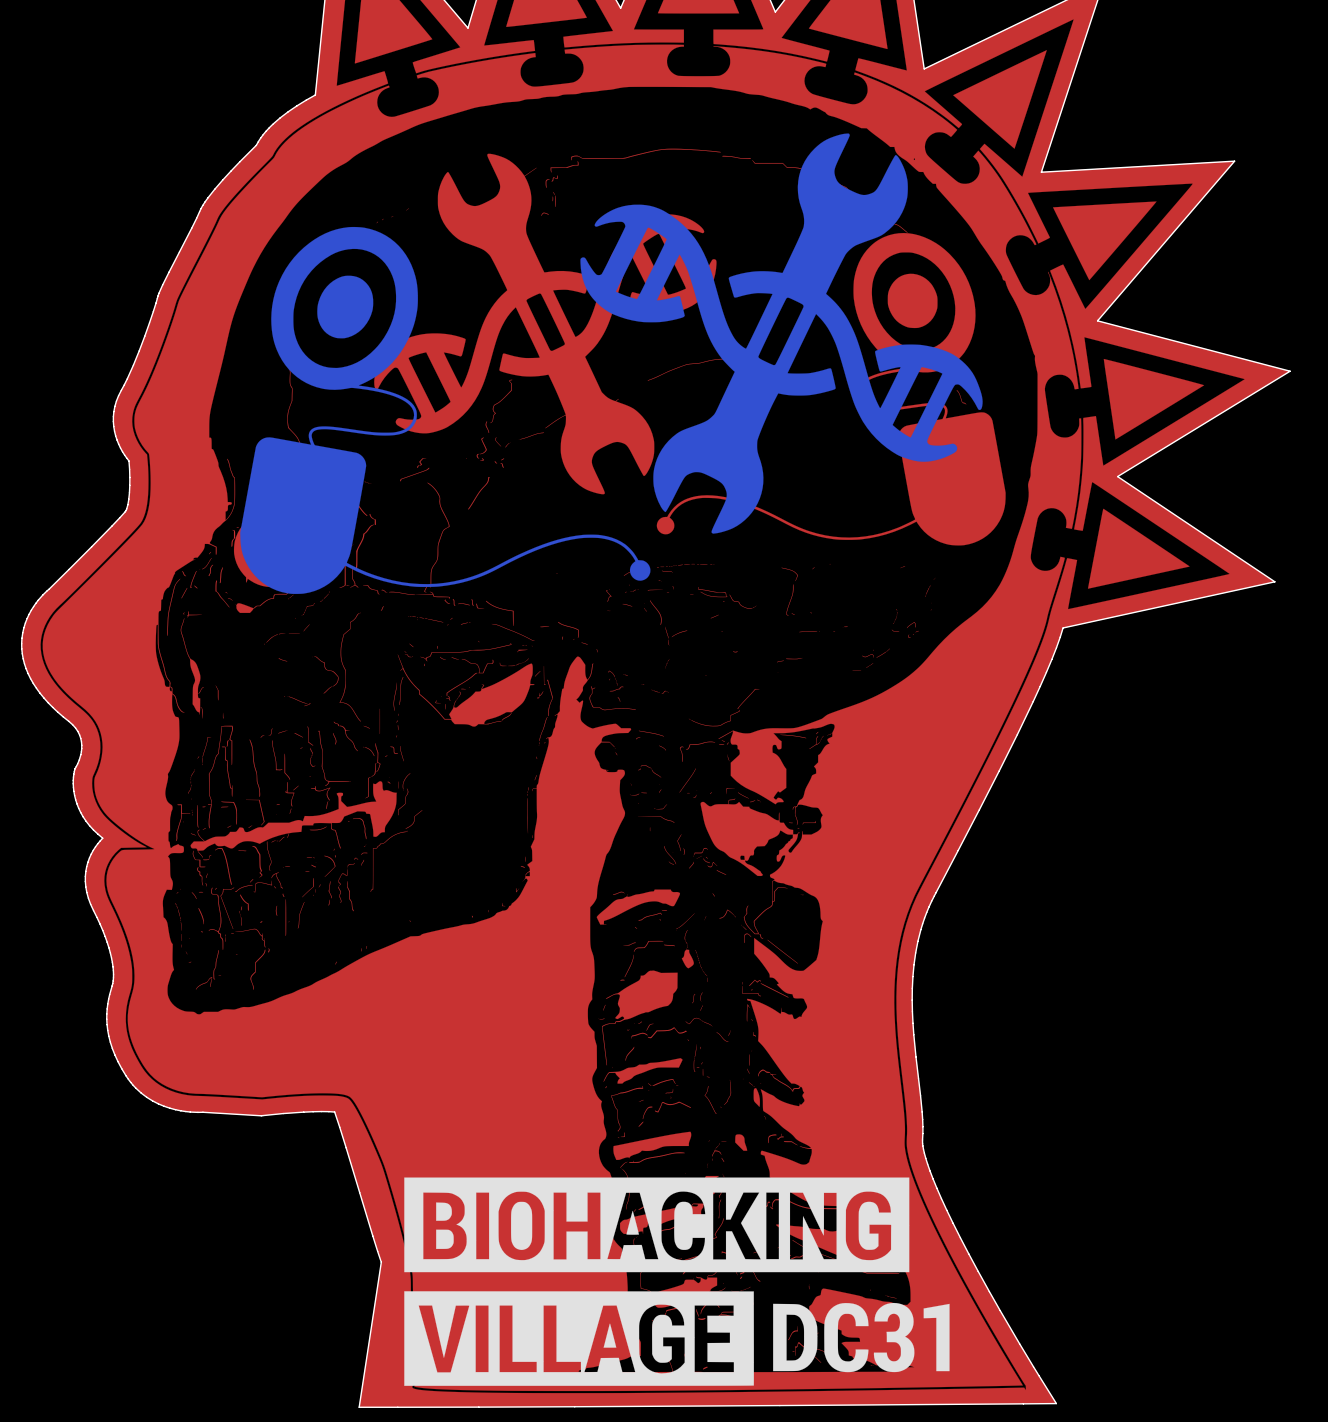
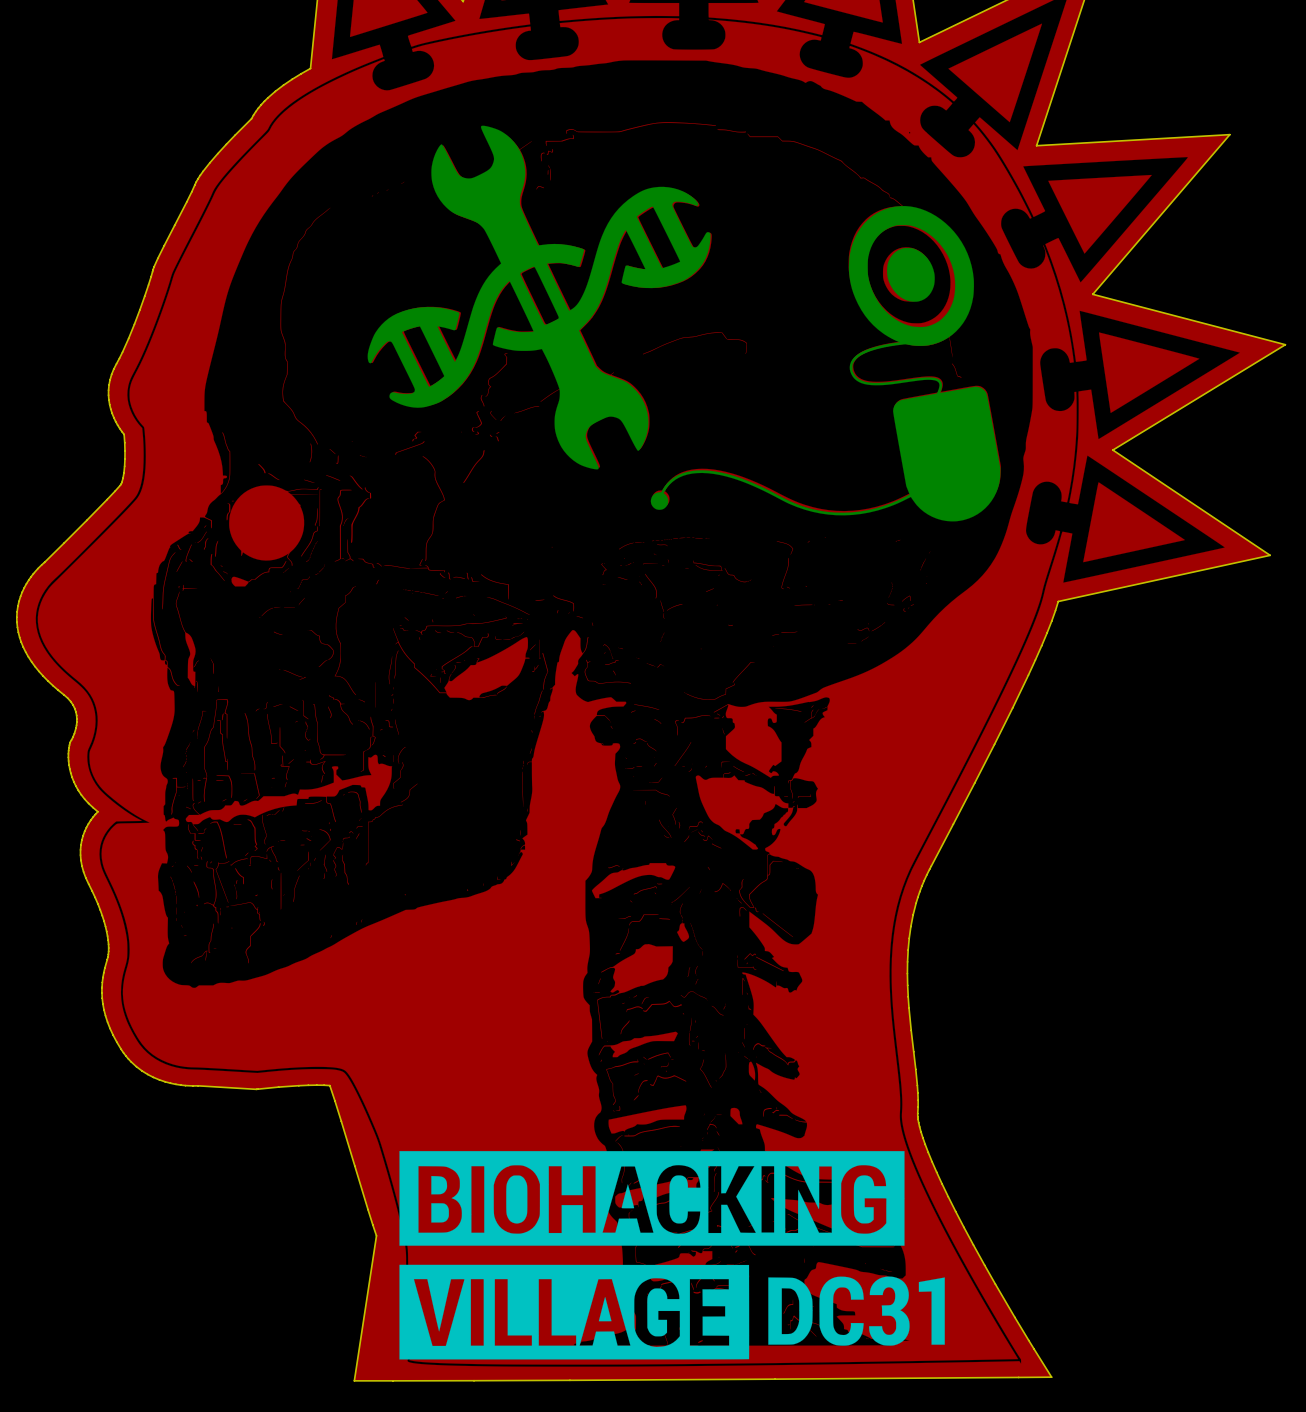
drawing: [240, 133, 983, 594] -> none
drawing: none -> [367, 125, 1001, 522]

